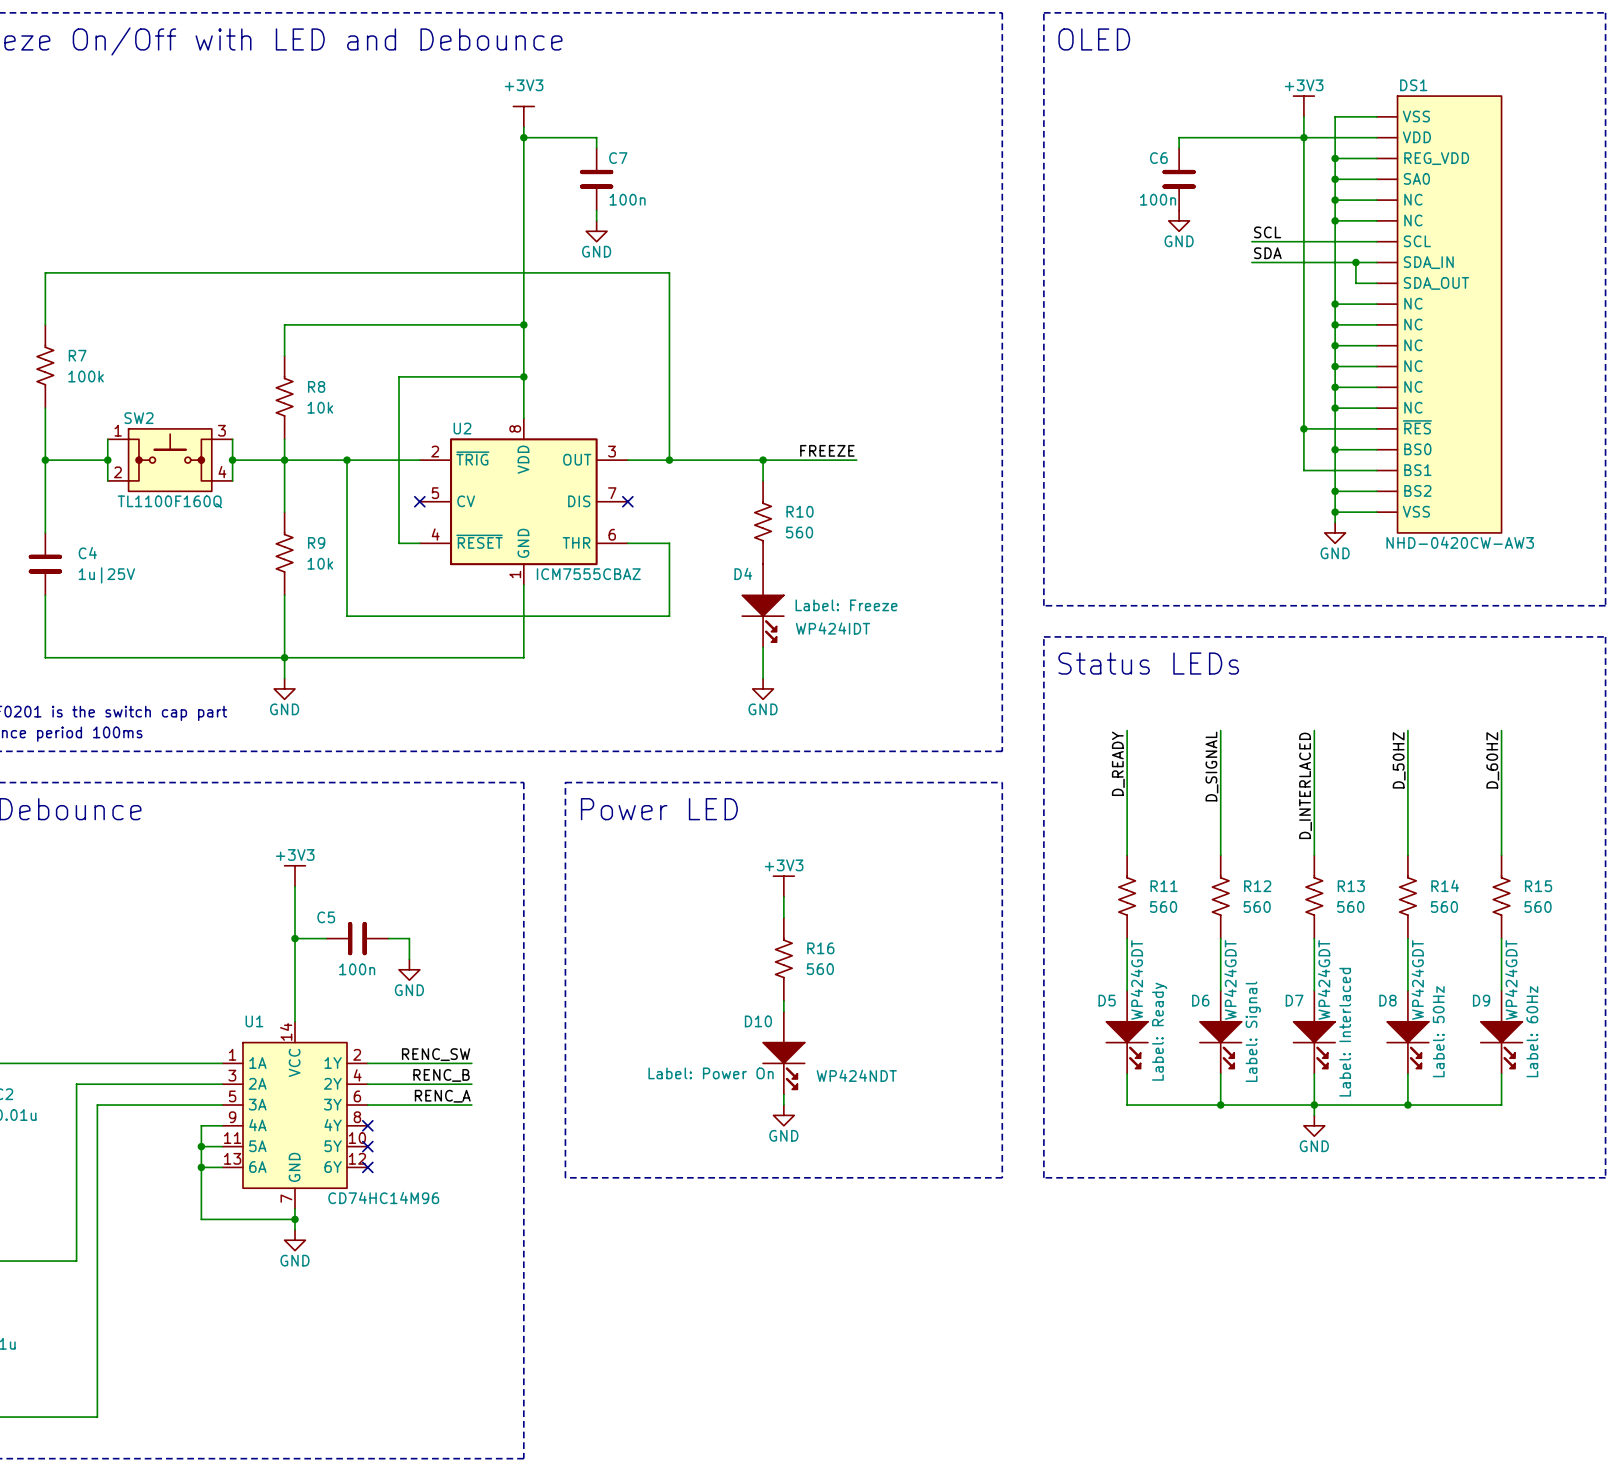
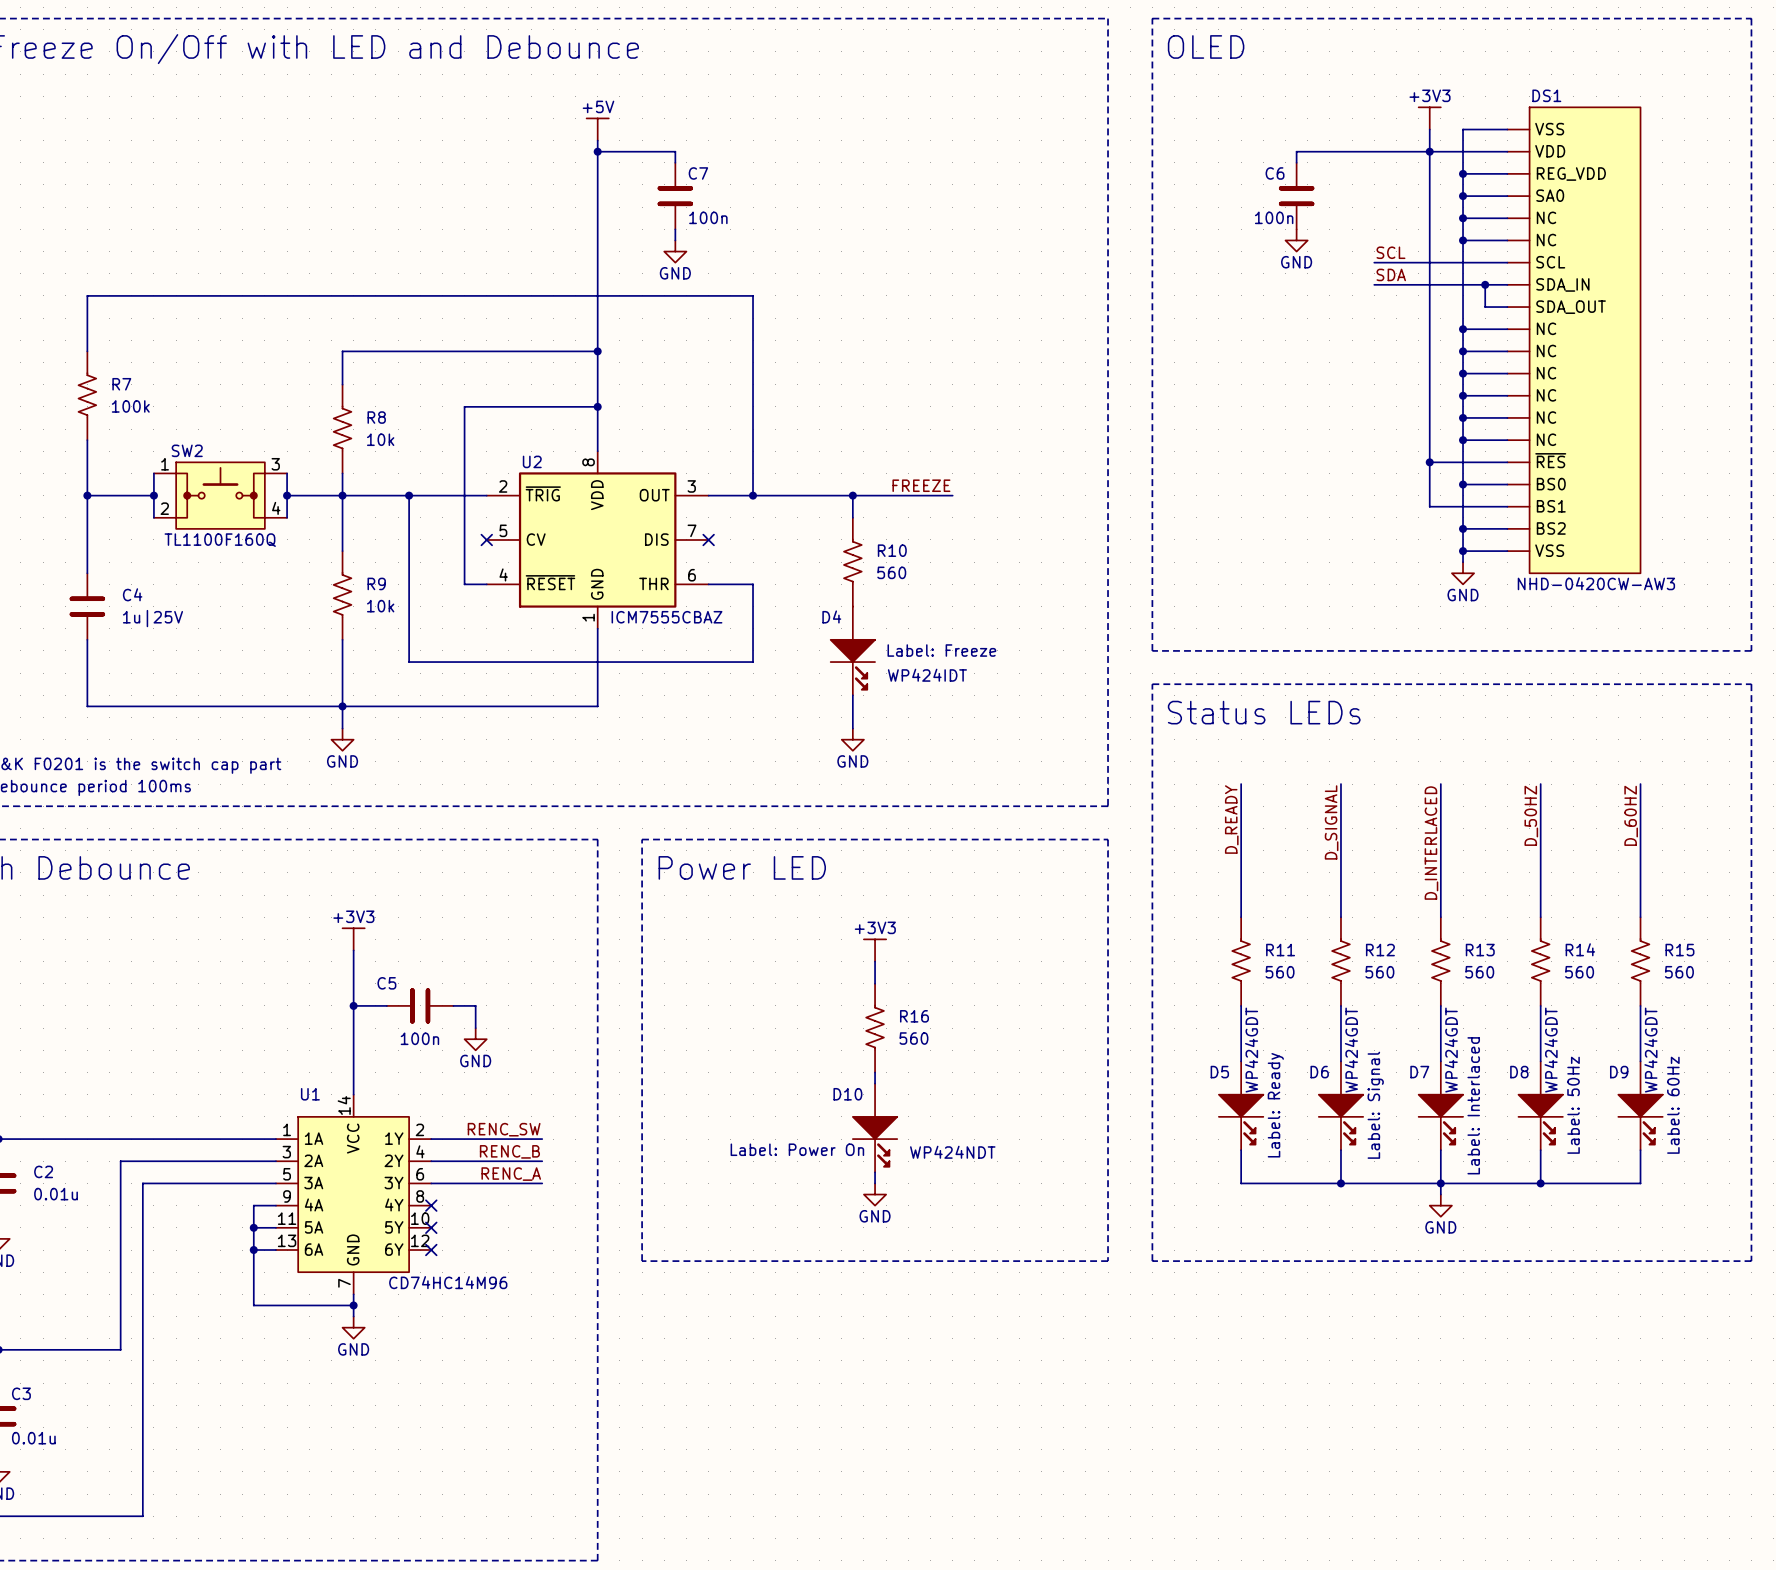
power symbol: +3V3 (523, 116) -> +5V (597, 129)

